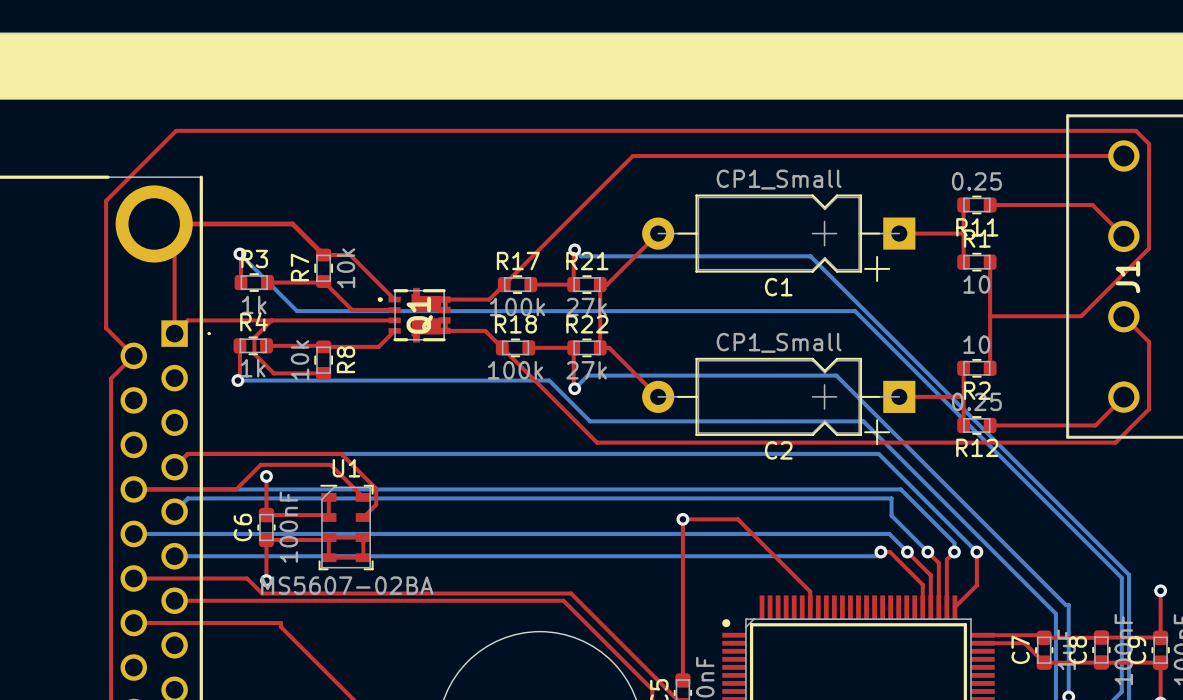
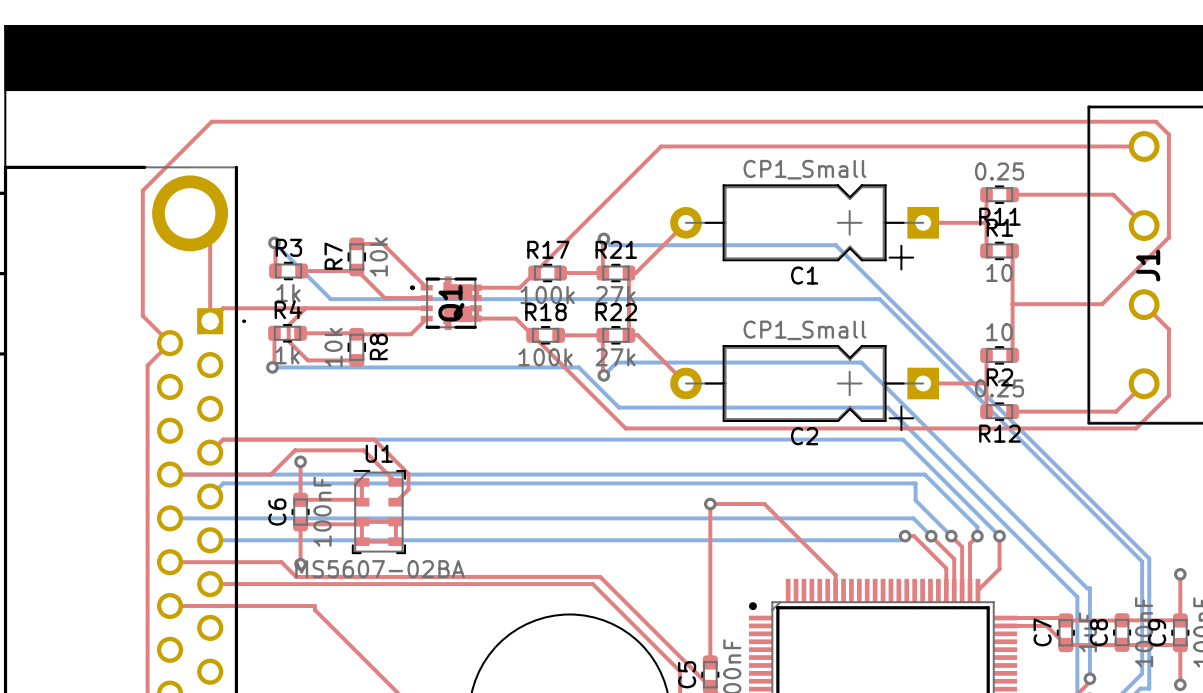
top track: (154, 223) (292, 223) (323, 255) -> none

